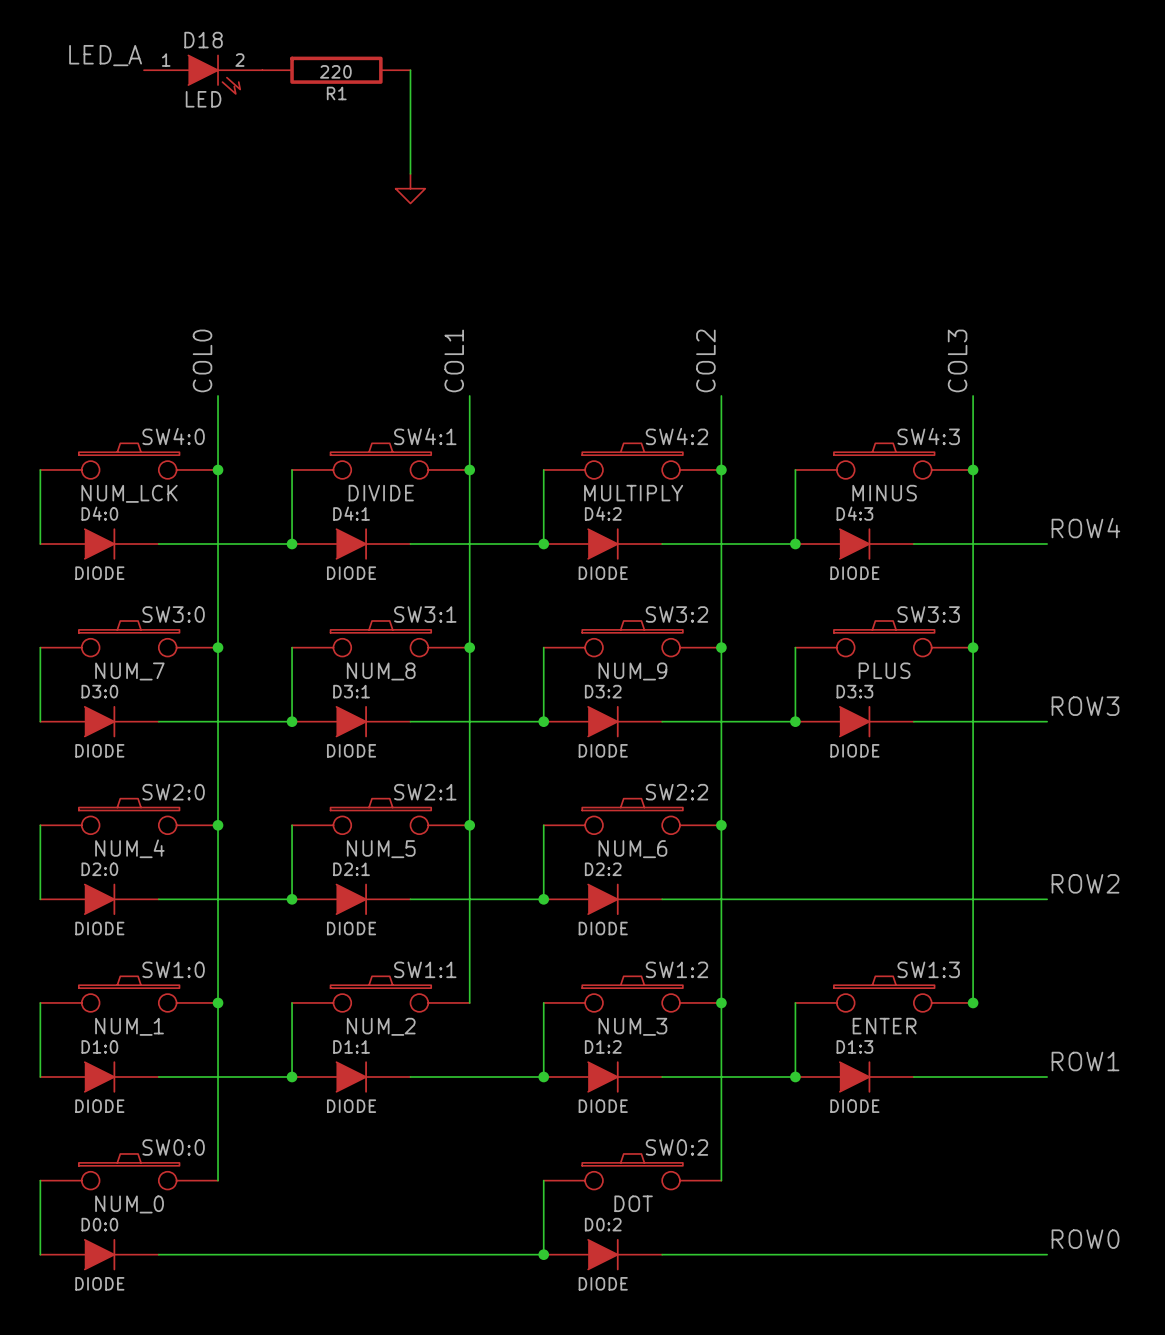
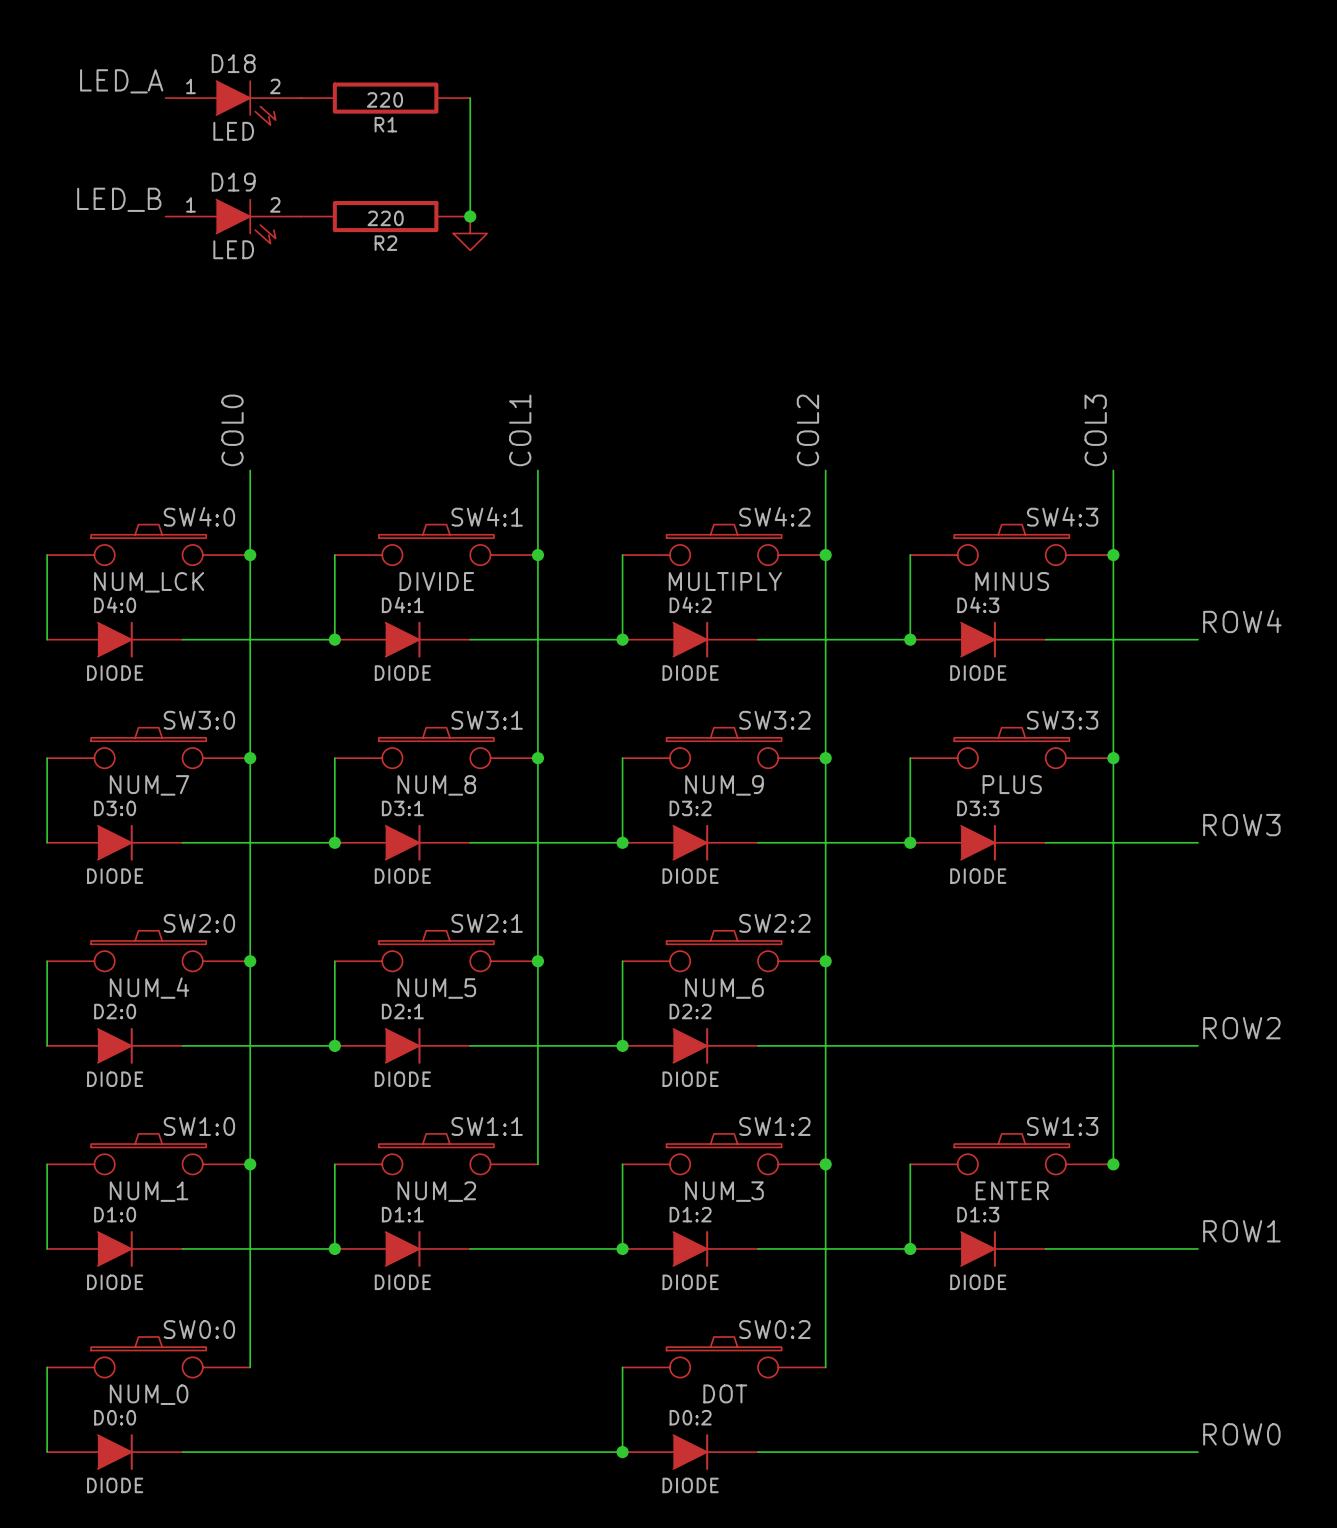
label: none -> LED_B (119, 199)
R2: none -> 220 (385, 216)
junction: none -> (470, 216)
D19: none -> LED (233, 221)

